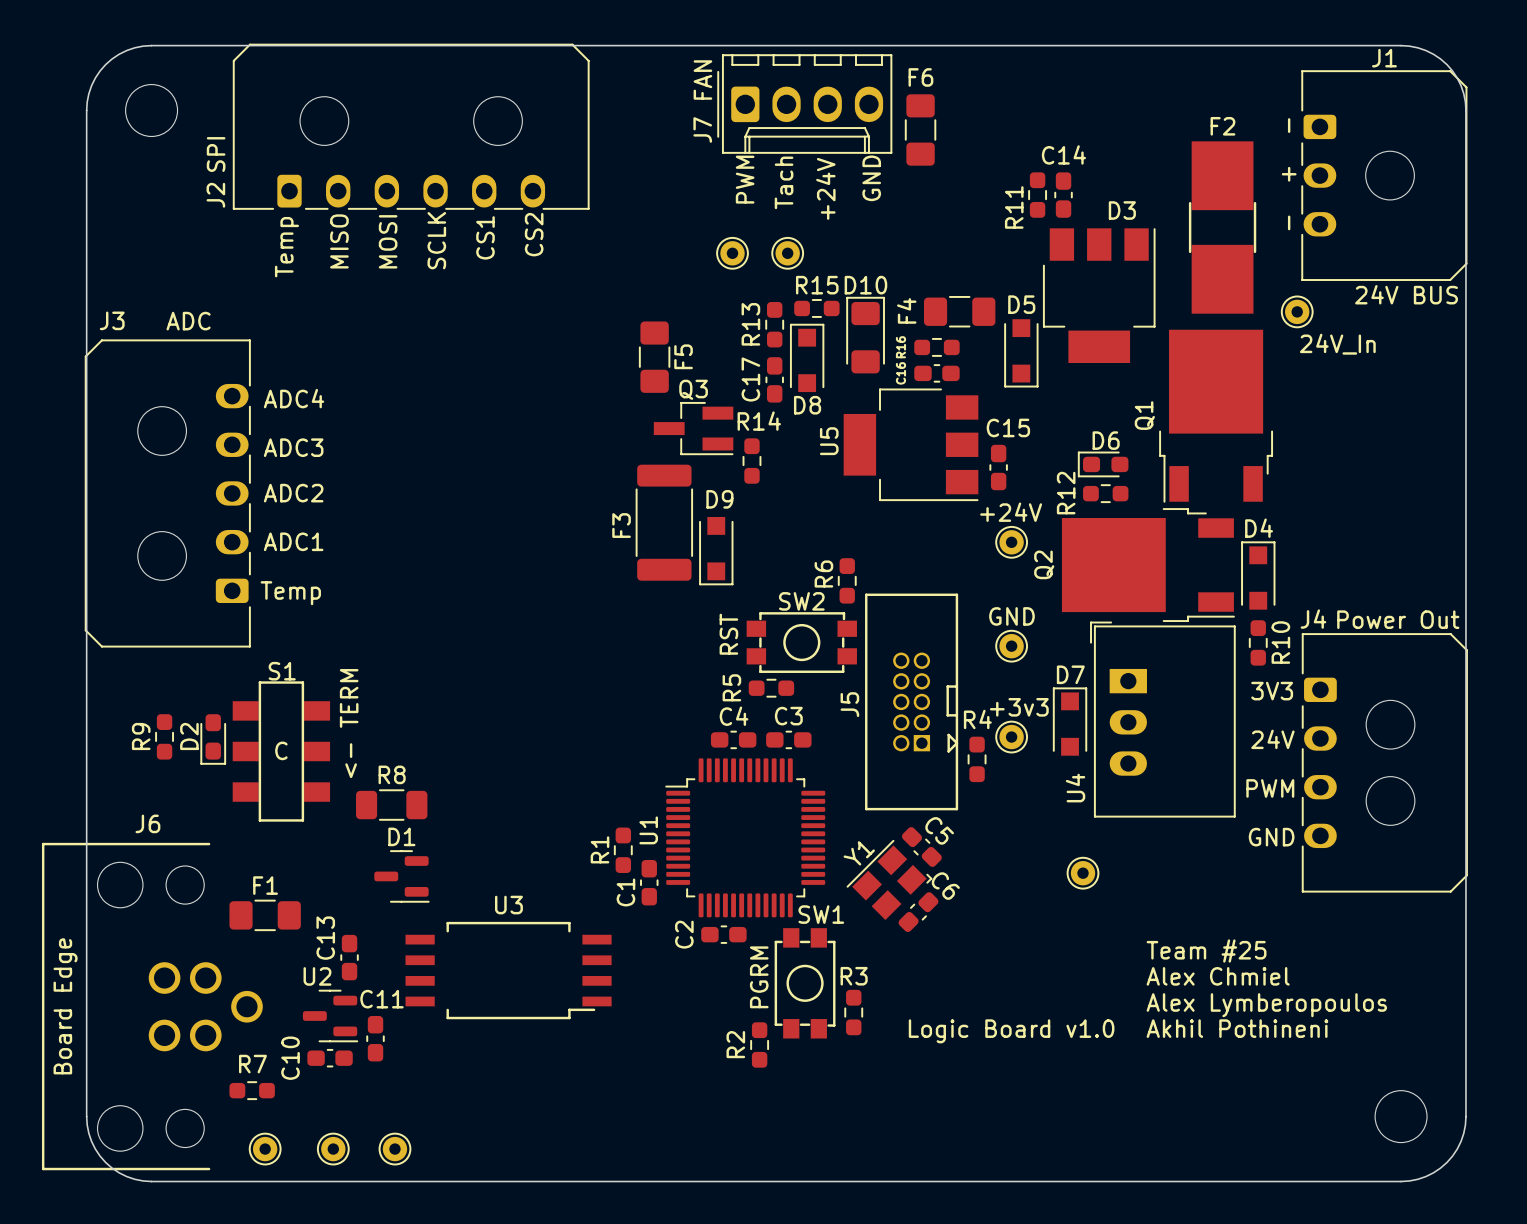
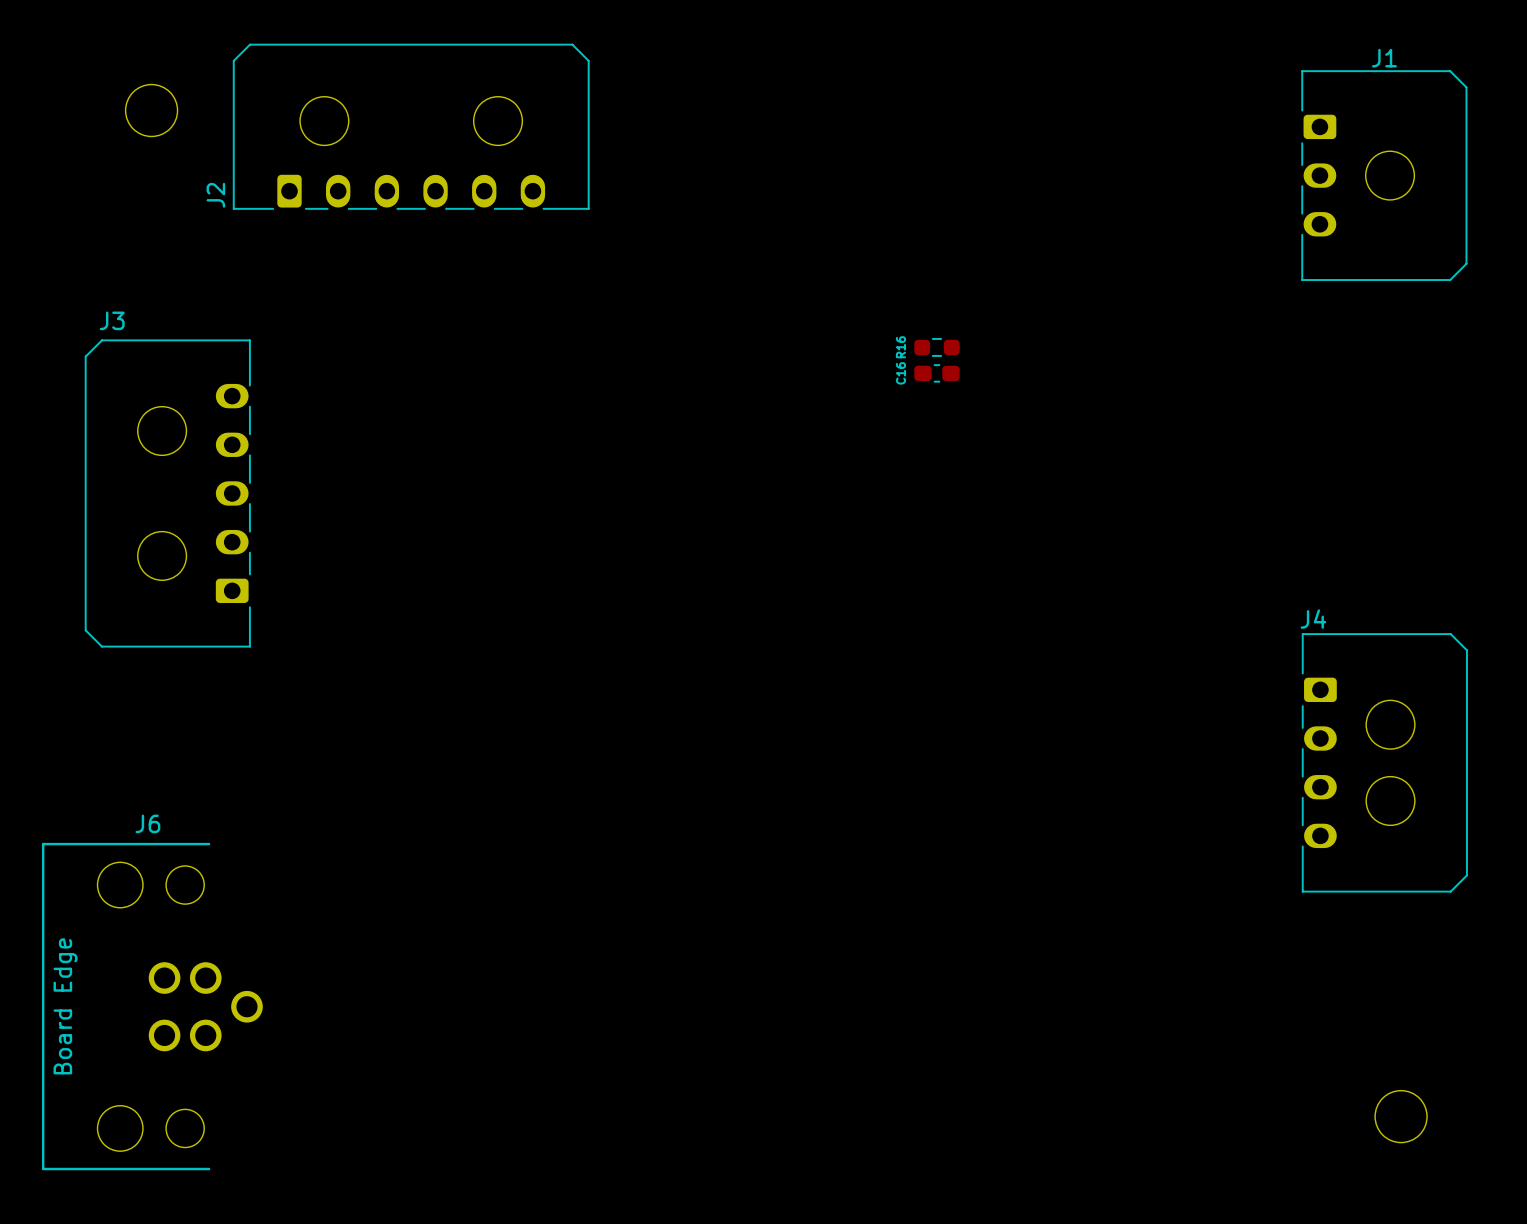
board edge: (151, 45) (1401, 45) (1425, 50) (1440, 59) (1457, 78) (1463, 93) (1465, 110) (1465, 1116) (1463, 1133) (1452, 1156) (1433, 1172) (1417, 1179) (1401, 1181) (151, 1181) (134, 1179) (112, 1168) (100, 1156) (91, 1141) (86, 1116) (86, 110) (91, 85) (105, 64) (126, 50) (151, 45) -> none
text: FAN (702, 80) -> none
J7: (804, 104) -> none
text: - (1289, 125) -> none
F6: (920, 129) -> none
text: SPI (216, 154) -> none
text: + (1289, 174) -> none
text: GND (871, 178) -> none
text: PWM (745, 179) -> none
text: Tach (784, 182) -> none
text: +24V (825, 188) -> none
R11: (1037, 195) -> none
C14: (1063, 195) -> none
text: - (1289, 222) -> none
F2: (1222, 227) -> none
text: CS2 (534, 234) -> none
text: CS1 (485, 237) -> none
text: SCLK (436, 240) -> none
text: MISO (339, 241) -> none
text: MOSI (388, 241) -> none
text: Temp (286, 247) -> none
part: (732, 253) -> none
part: (787, 253) -> none
text: 24V BUS (1406, 294) -> none
D3: (1099, 295) -> none
R15: (816, 308) -> none
F4: (959, 311) -> none
part: (1297, 311) -> none
text: ADC (188, 321) -> none
R13: (774, 324) -> none
D10: (865, 335) -> none
text: 24V_In (1337, 344) -> none
D5: (1021, 353) -> none
F5: (654, 357) -> none
D8: (807, 357) -> none
C17: (774, 379) -> none
text: ADC4 (294, 398) -> none
Q1: (1216, 416) -> none
Q3: (693, 428) -> none
U5: (911, 444) -> none
text: ADC3 (293, 447) -> none
R14: (751, 461) -> none
D6: (1103, 464) -> none
C15: (998, 467) -> none
text: ADC2 (293, 493) -> none
R12: (1105, 493) -> none
text: +24V (1011, 512) -> none
F3: (664, 522) -> none
text: ADC1 (293, 541) -> none
part: (1011, 542) -> none
D9: (716, 551) -> none
Q2: (1148, 565) -> none
D4: (1258, 575) -> none
R6: (847, 580) -> none
text: Temp (290, 593) -> none
text: GND (1011, 616) -> none
text: Power Out (1398, 619) -> none
text: RST (728, 634) -> none
SW2: (801, 642) -> none
R10: (1258, 642) -> none
part: (1011, 646) -> none
R5: (771, 688) -> none
text: 3V3 (1272, 691) -> none
J5: (911, 701) -> none
text: +3v3 (1019, 707) -> none
U4: (1162, 719) -> none
D7: (1070, 721) -> none
text: <- TERM (349, 723) -> none
R9: (164, 736) -> none
part: (1011, 737) -> none
D2: (213, 739) -> none
C4: (733, 739) -> none
C3: (788, 739) -> none
text: 24V (1272, 739) -> none
S1: (281, 751) -> none
R4: (977, 759) -> none
text: PWM (1270, 788) -> none
R8: (391, 805) -> none
U1: (745, 837) -> none
text: GND (1271, 837) -> none
C5: (921, 847) -> none
R1: (623, 850) -> none
part: (1083, 873) -> none
D1: (401, 876) -> none
Y1: (889, 879) -> none
C1: (649, 882) -> none
C6: (918, 912) -> none
F1: (265, 915) -> none
C2: (723, 934) -> none
text: Team #25 (1206, 951) -> none
C13: (349, 957) -> none
U3: (508, 970) -> none
text: Alex Chmiel (1218, 976) -> none
text: PGRM (759, 977) -> none
SW1: (805, 983) -> none
text: Alex Lymberopoulos (1266, 1005) -> none
R3: (853, 1012) -> none
U2: (330, 1015) -> none
text: Akhil Pothineni (1237, 1028) -> none
text: Logic Board v1.0 (1011, 1031) -> none
C11: (375, 1038) -> none
R2: (759, 1044) -> none
C10: (330, 1058) -> none
R7: (252, 1090) -> none
part: (265, 1149) -> none
part: (333, 1149) -> none
part: (394, 1149) -> none

